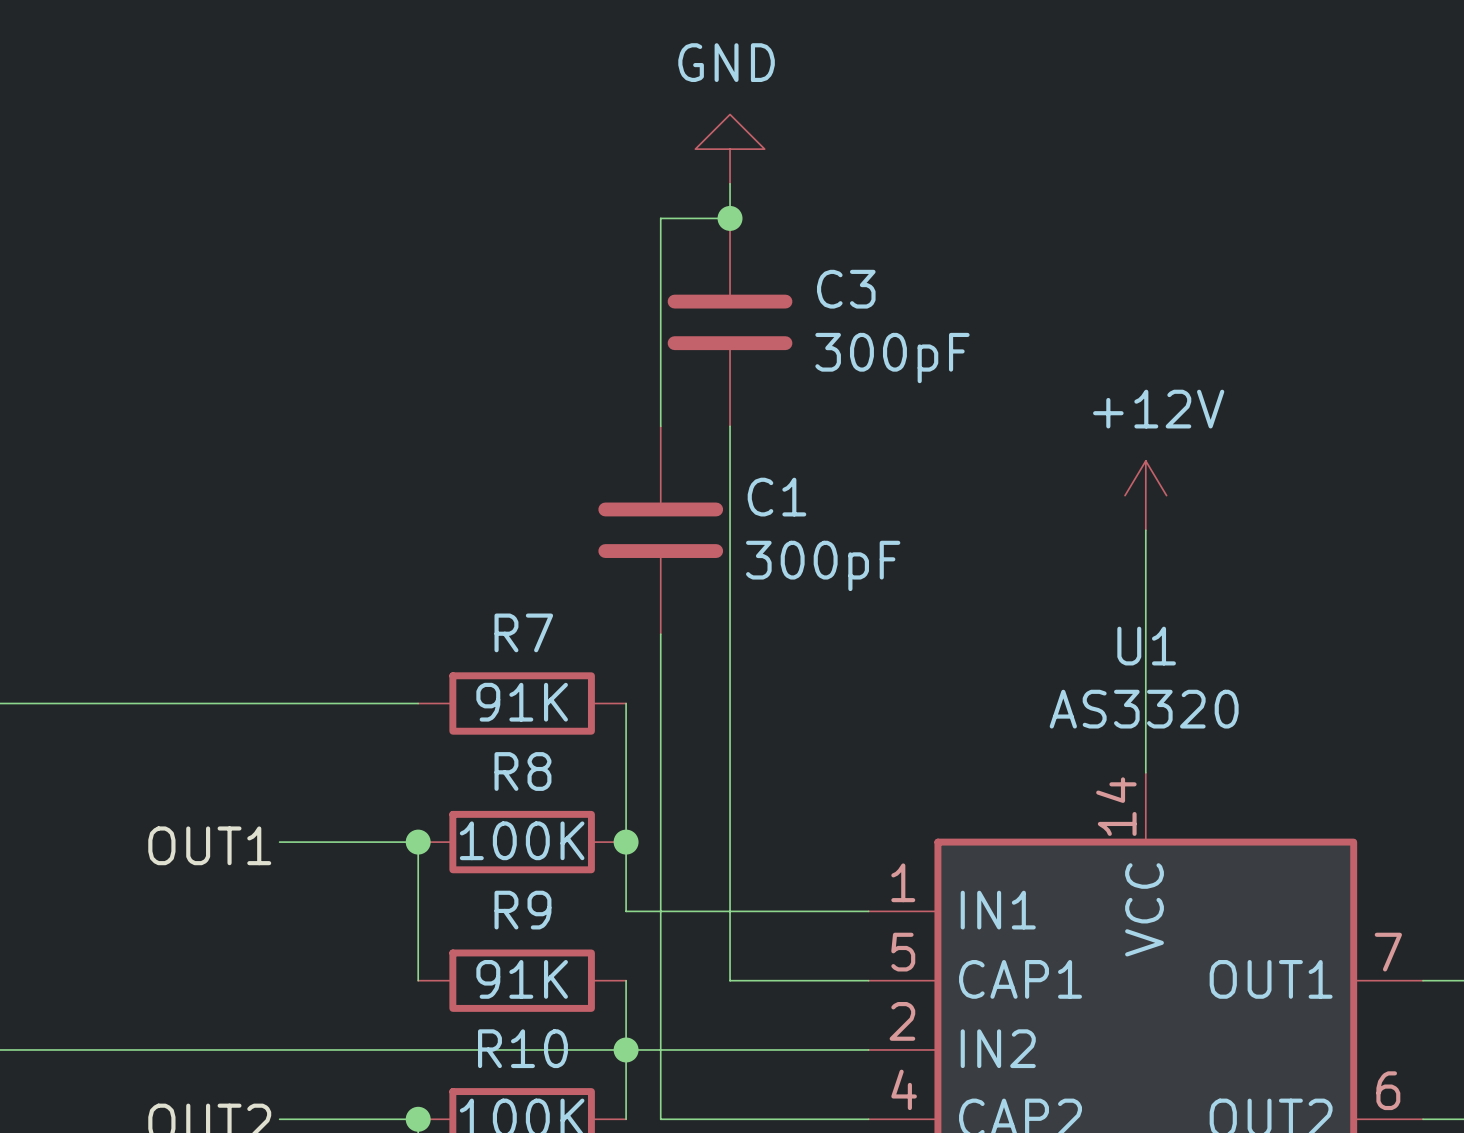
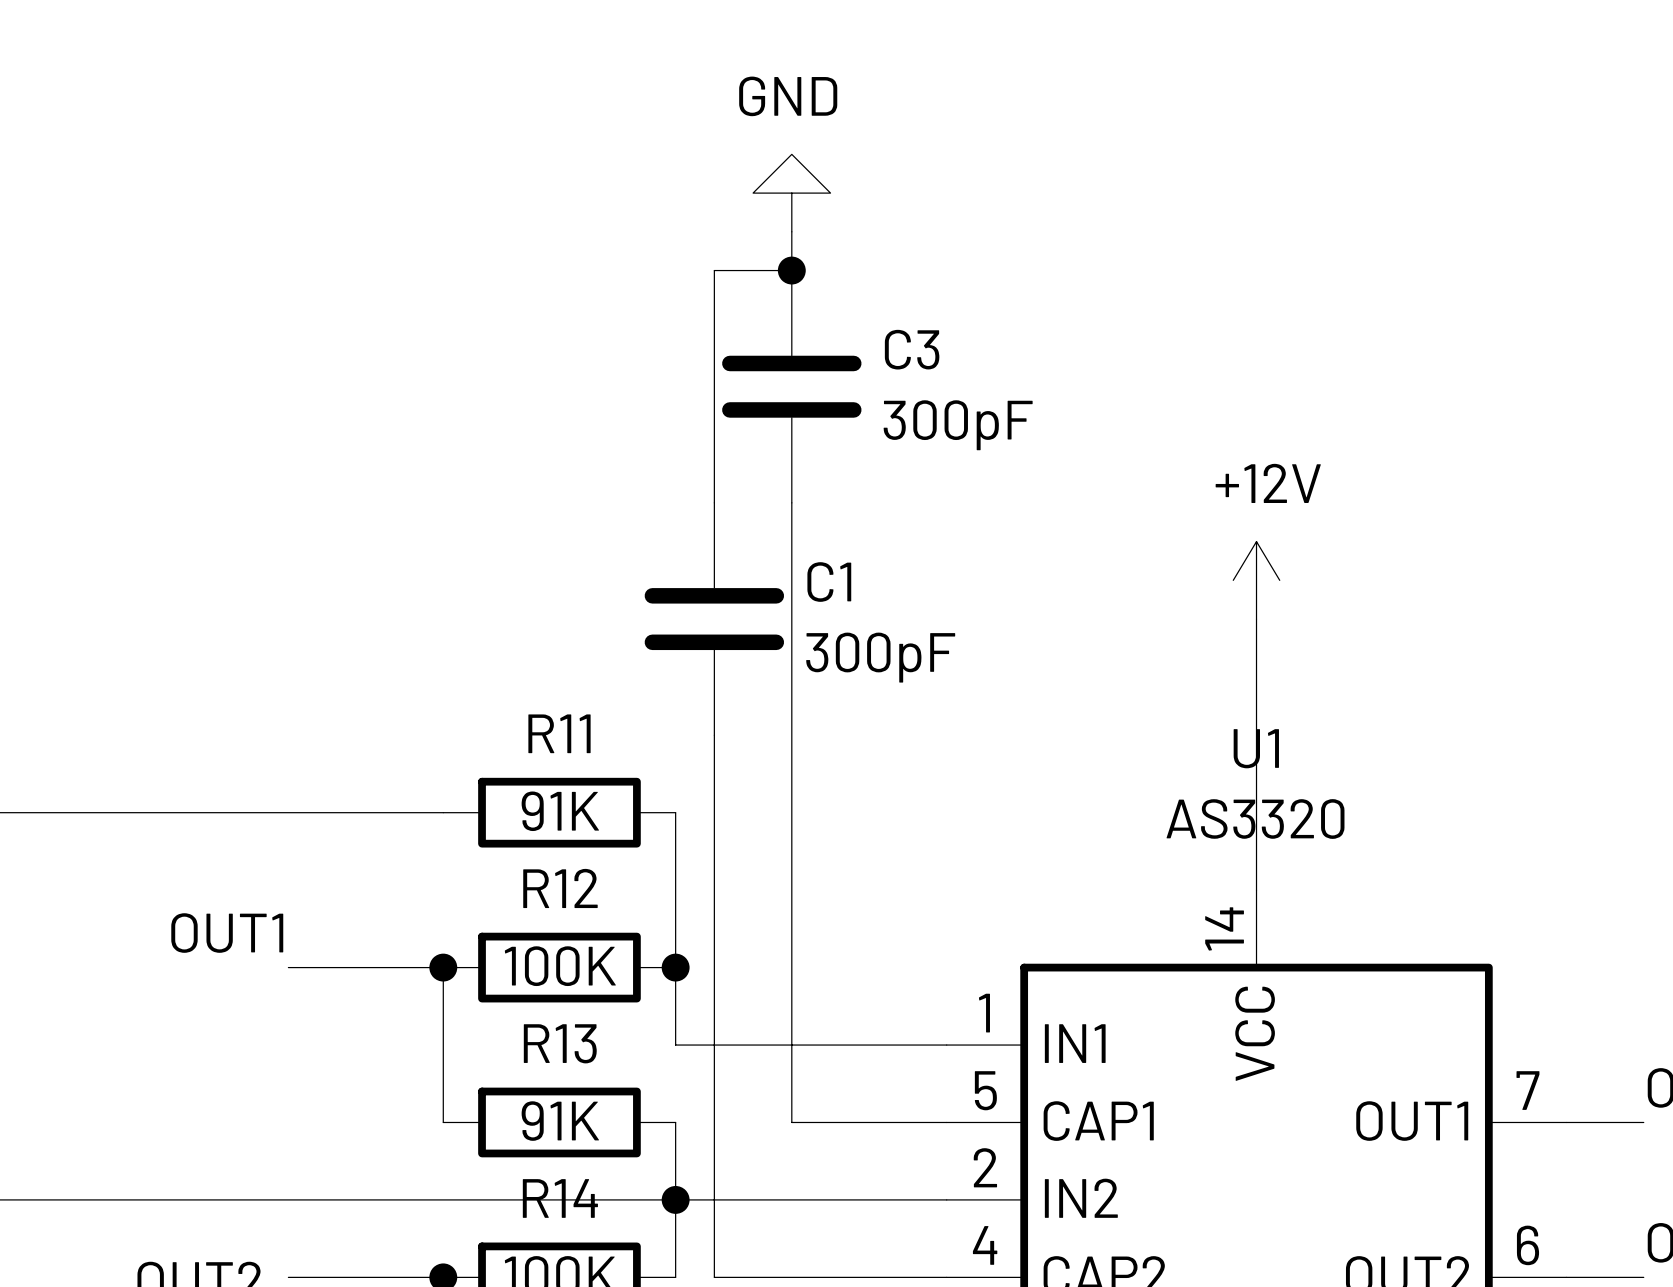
R7 name: R7 (523, 632) -> R11 (559, 733)
R8 name: R8 (522, 771) -> R12 (560, 888)
label position: OUT1 (209, 845) -> OUT1 (227, 933)
R9 name: R9 (522, 910) -> R13 (560, 1043)
R10 name: R10 (522, 1048) -> R14 (560, 1198)

